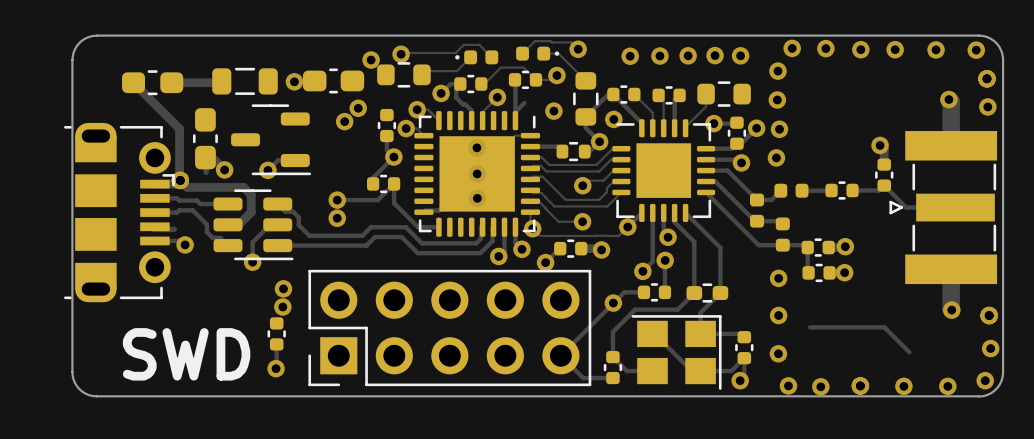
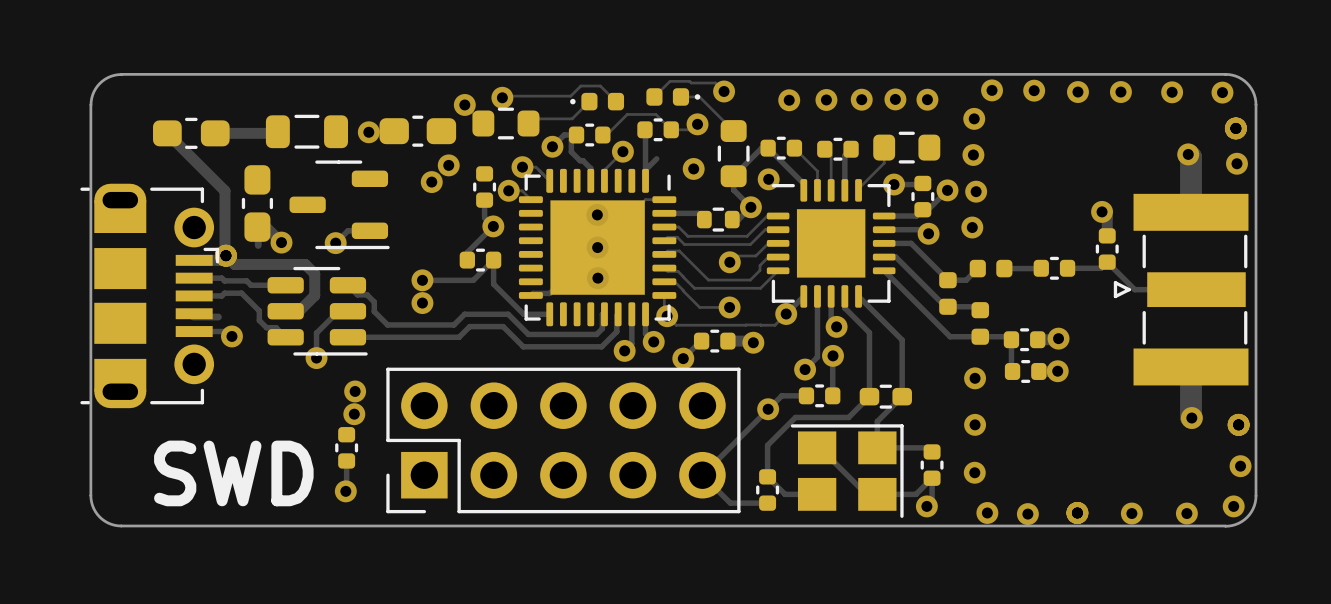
track: (810, 327) (884, 327) (909, 352) -> none

